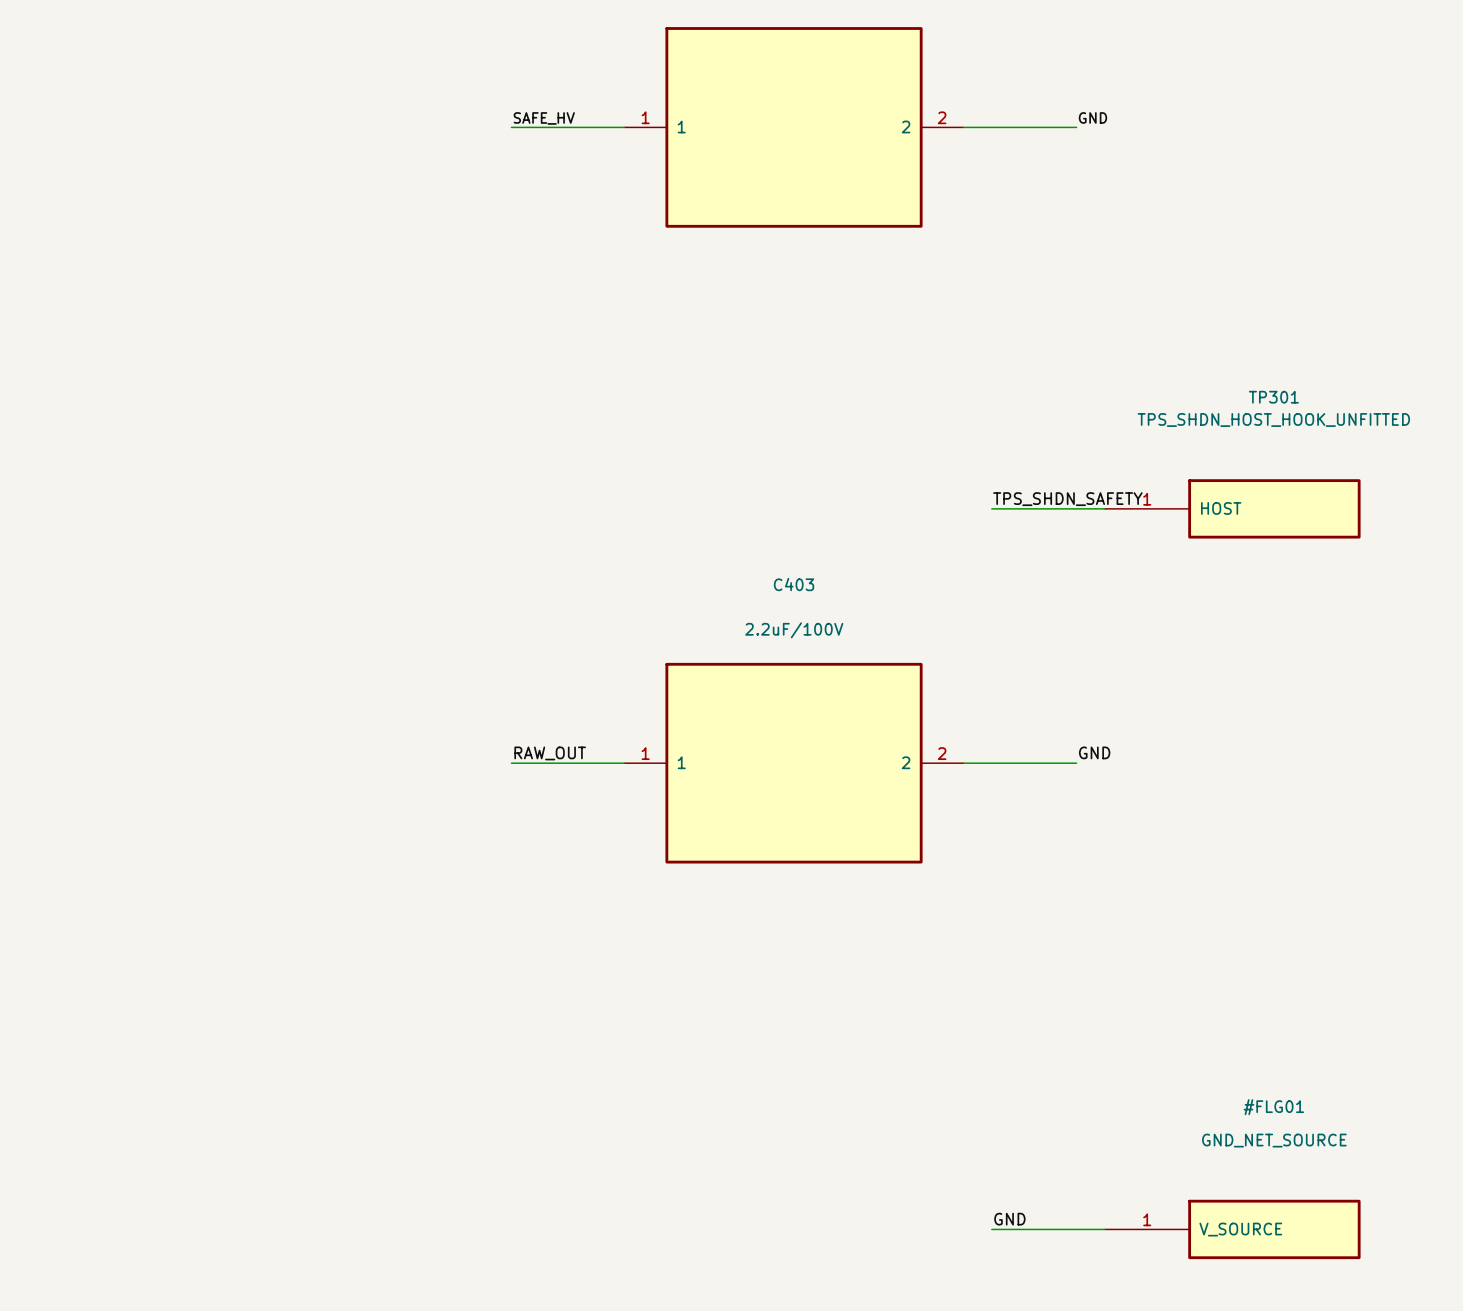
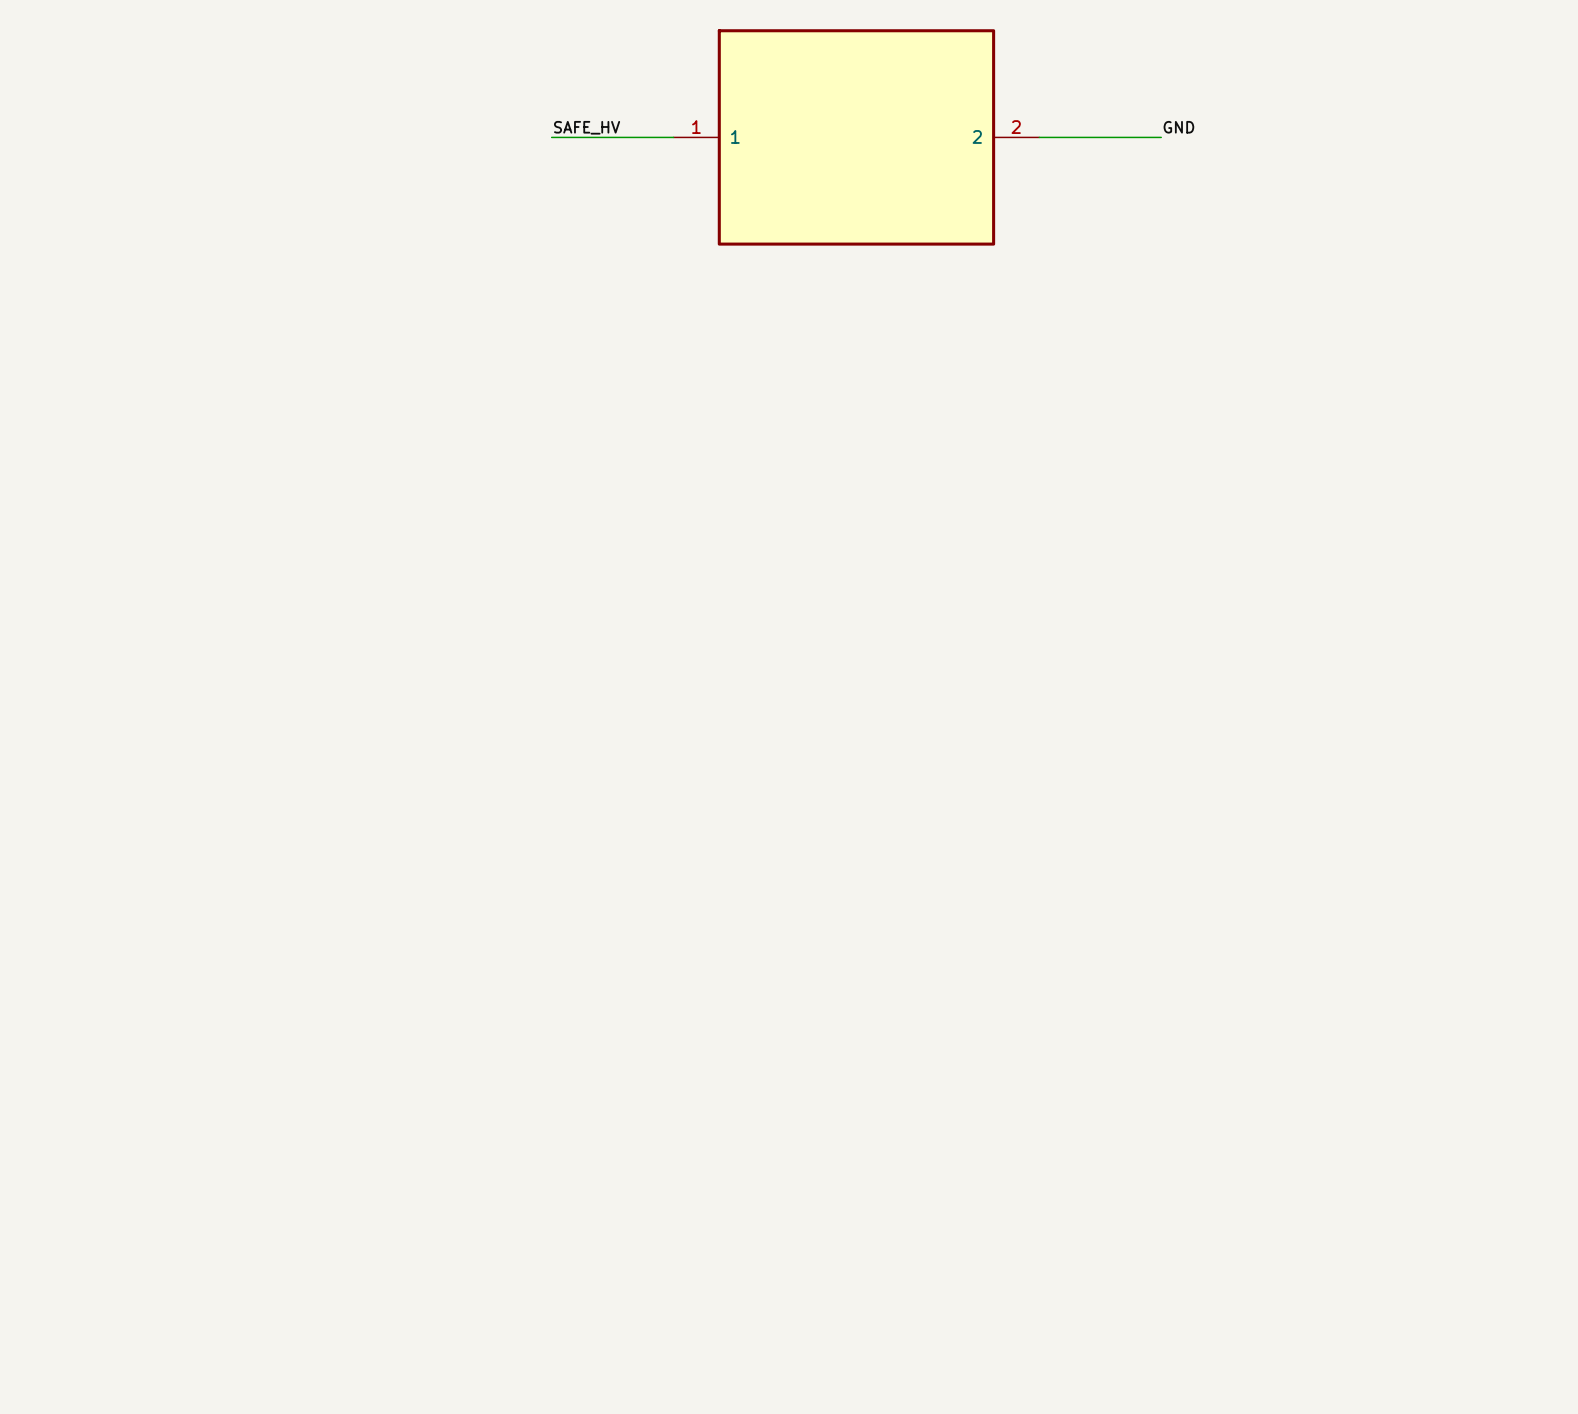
label: TPS_SHDN_SAFETY (1067, 499) -> none
wire: (991, 508) (1104, 508) -> none
TP301: TPS_SHDN_HOST_HOOK_UNFITTED (1232, 508) -> none
label: GND (1094, 752) -> none
label: RAW_OUT (550, 753) -> none
wire: (511, 763) (624, 763) -> none
C403: 2.2uF/100V (794, 763) -> none
wire: (963, 763) (1076, 763) -> none
label: GND (1009, 1219) -> none
wire: (991, 1229) (1104, 1229) -> none
#FLG01: GND_NET_SOURCE (1232, 1229) -> none

